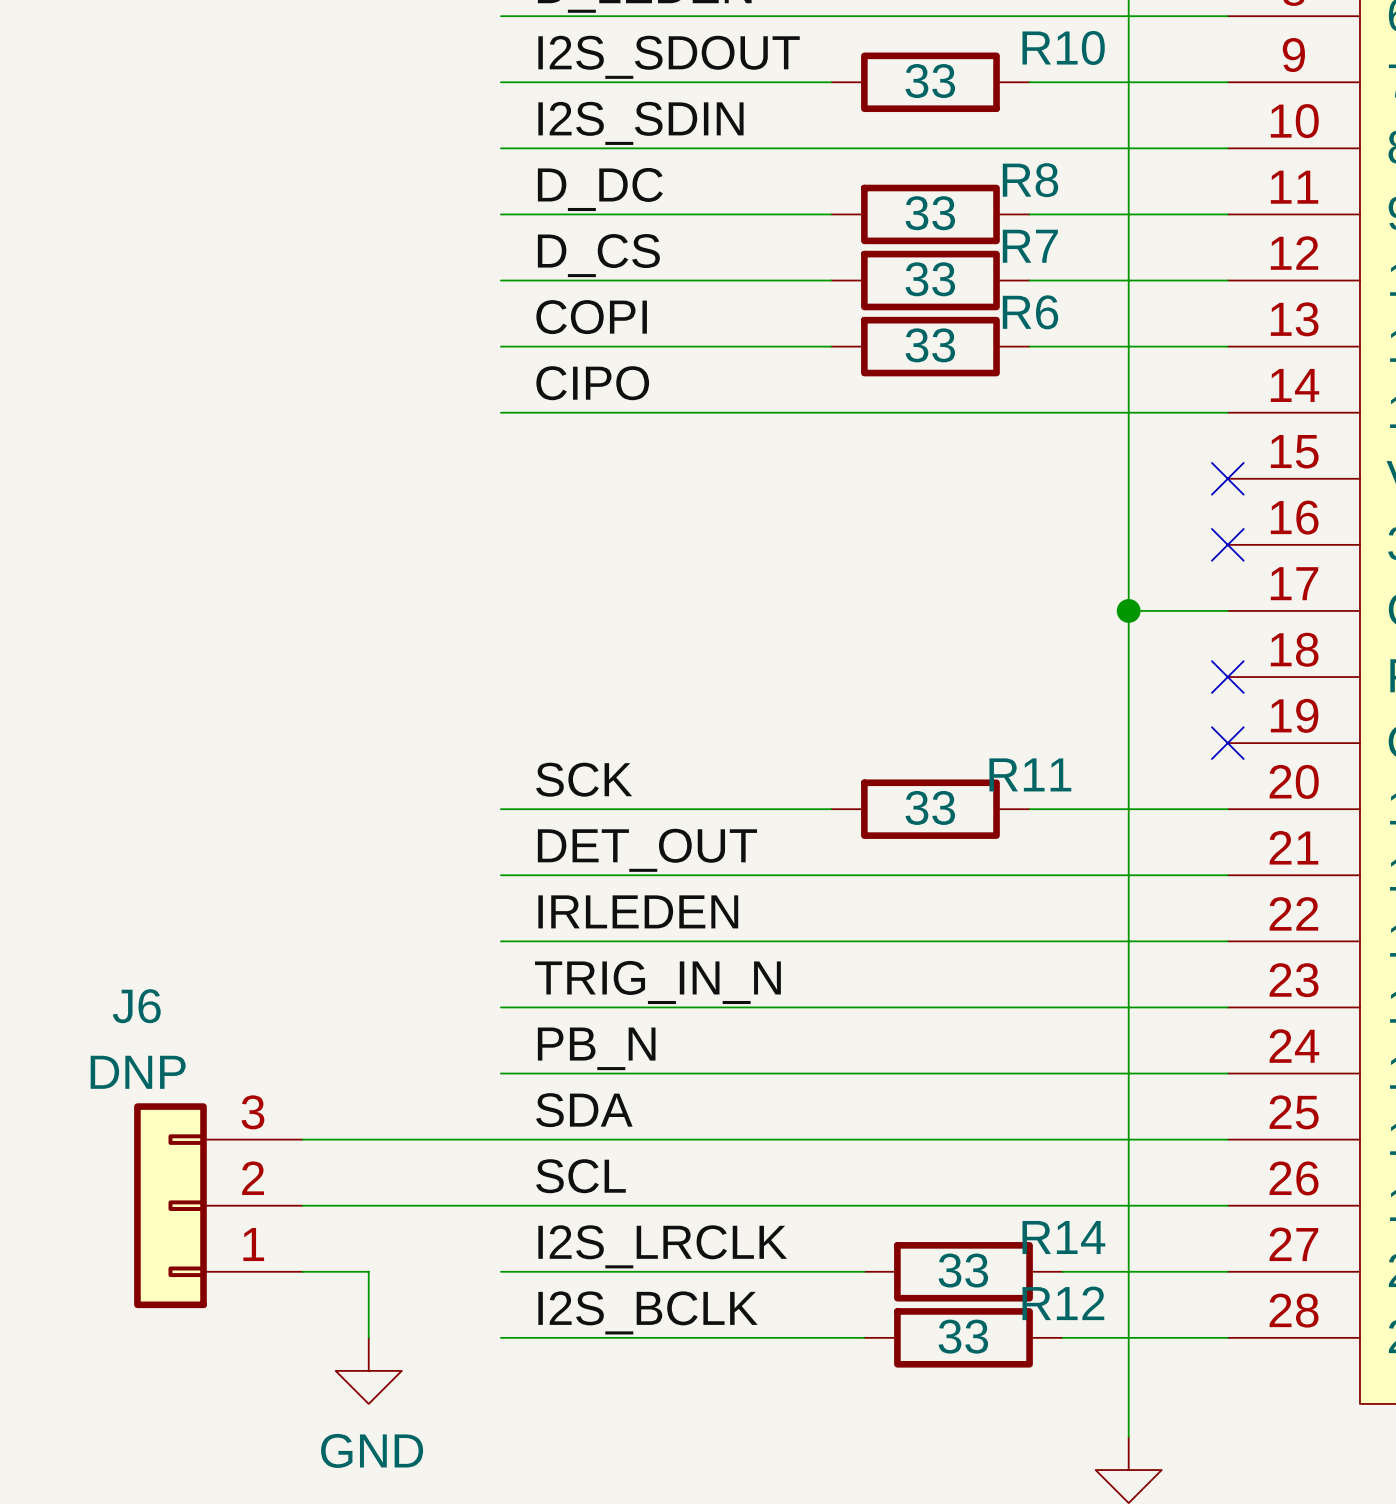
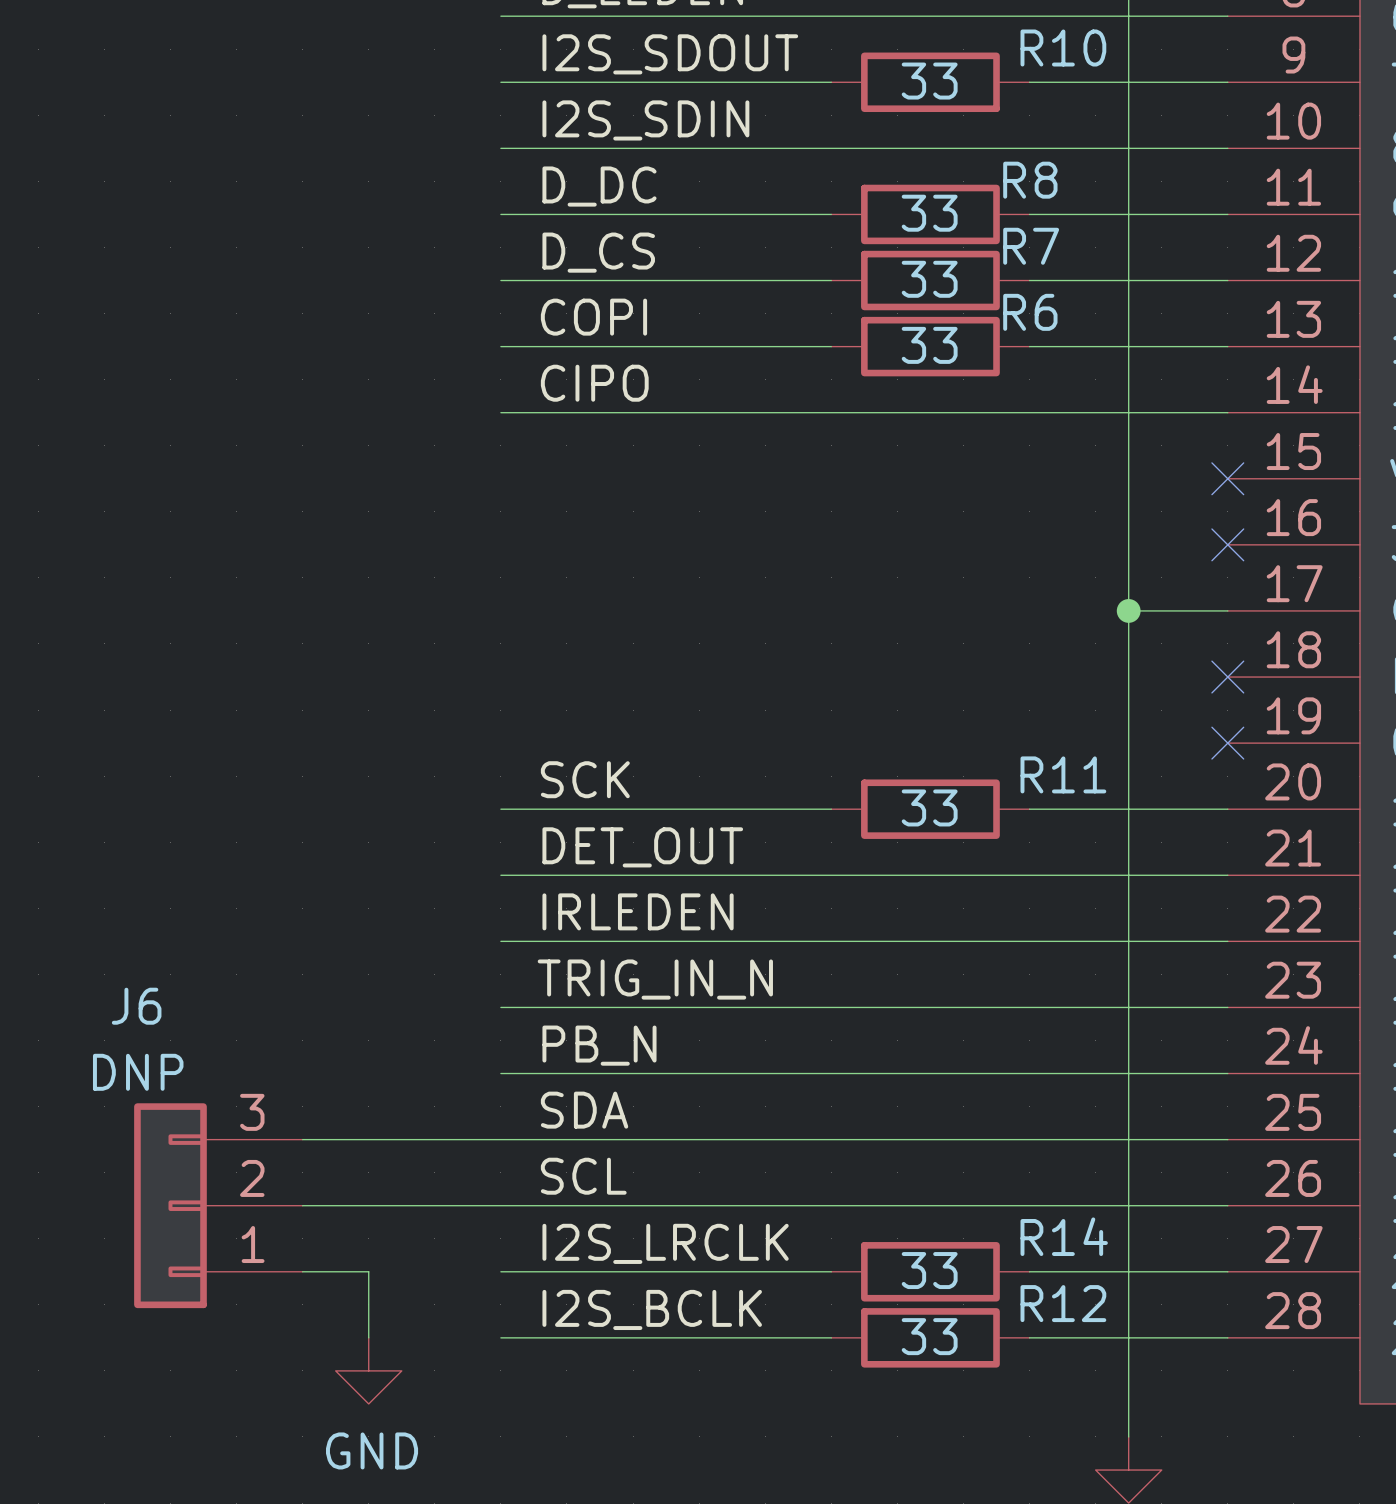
R11 name position: R11 (1030, 774) -> R11 (1063, 774)
R14 position: (963, 1271) -> (930, 1271)
R12 position: (963, 1337) -> (930, 1337)

